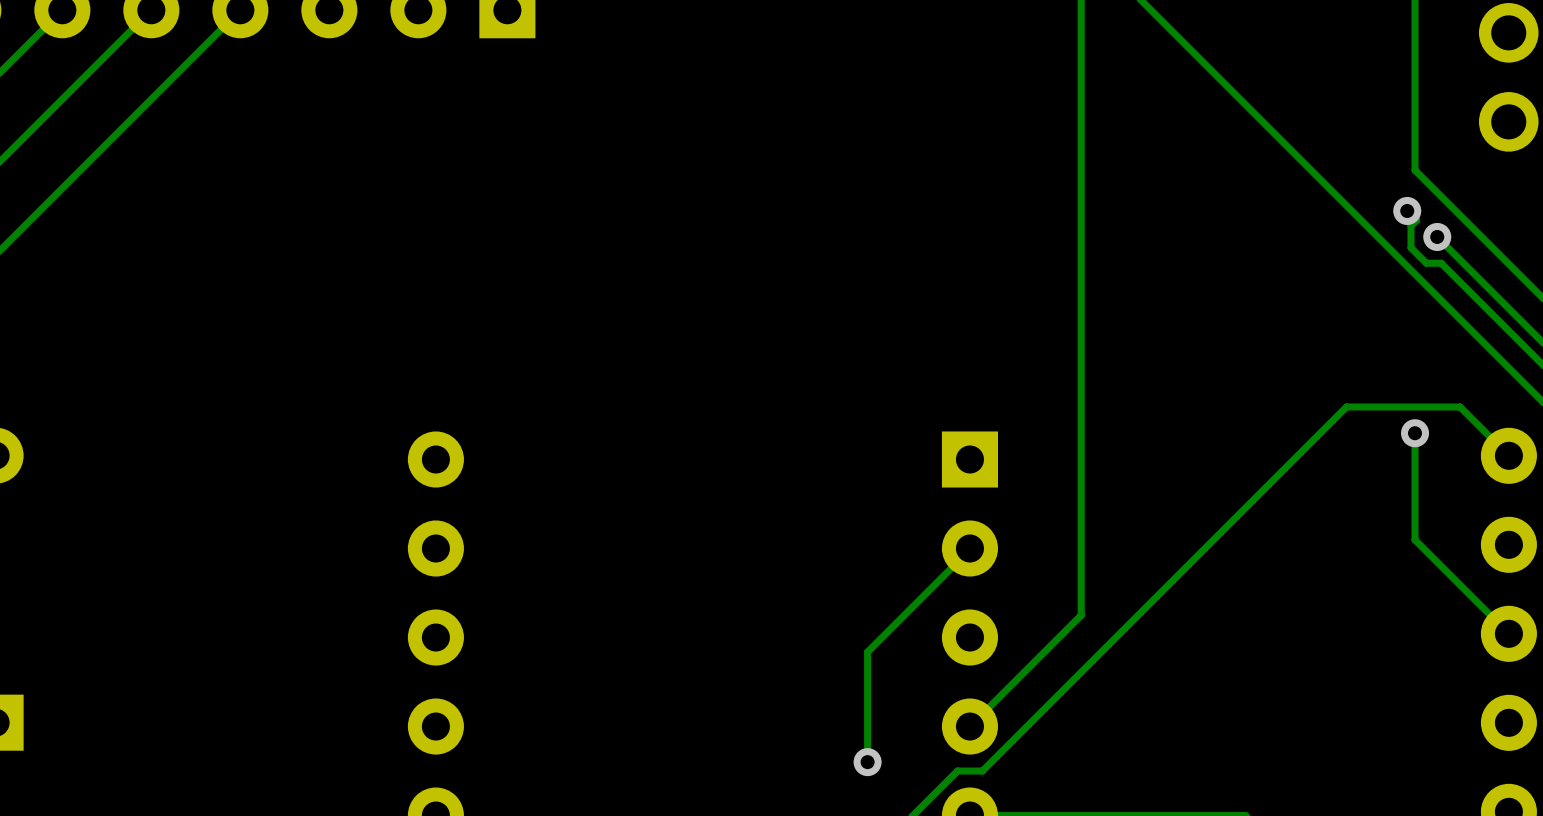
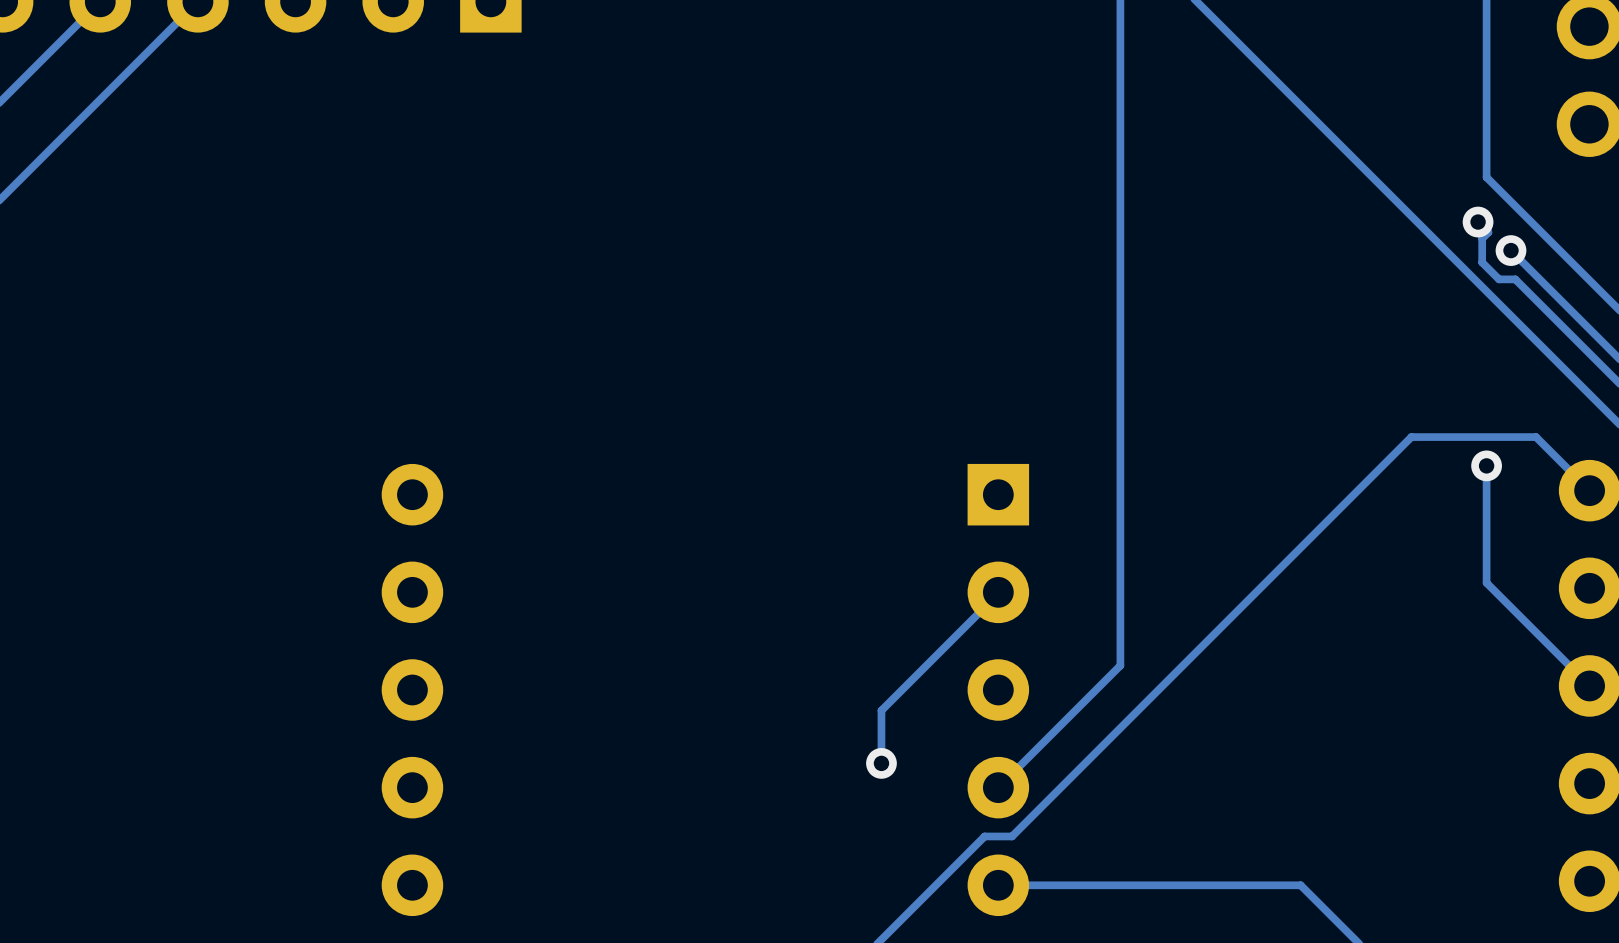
track: (867, 652) (867, 762) -> (886, 705) (881, 710) (881, 763)
via position: (867, 762) -> (881, 763)

